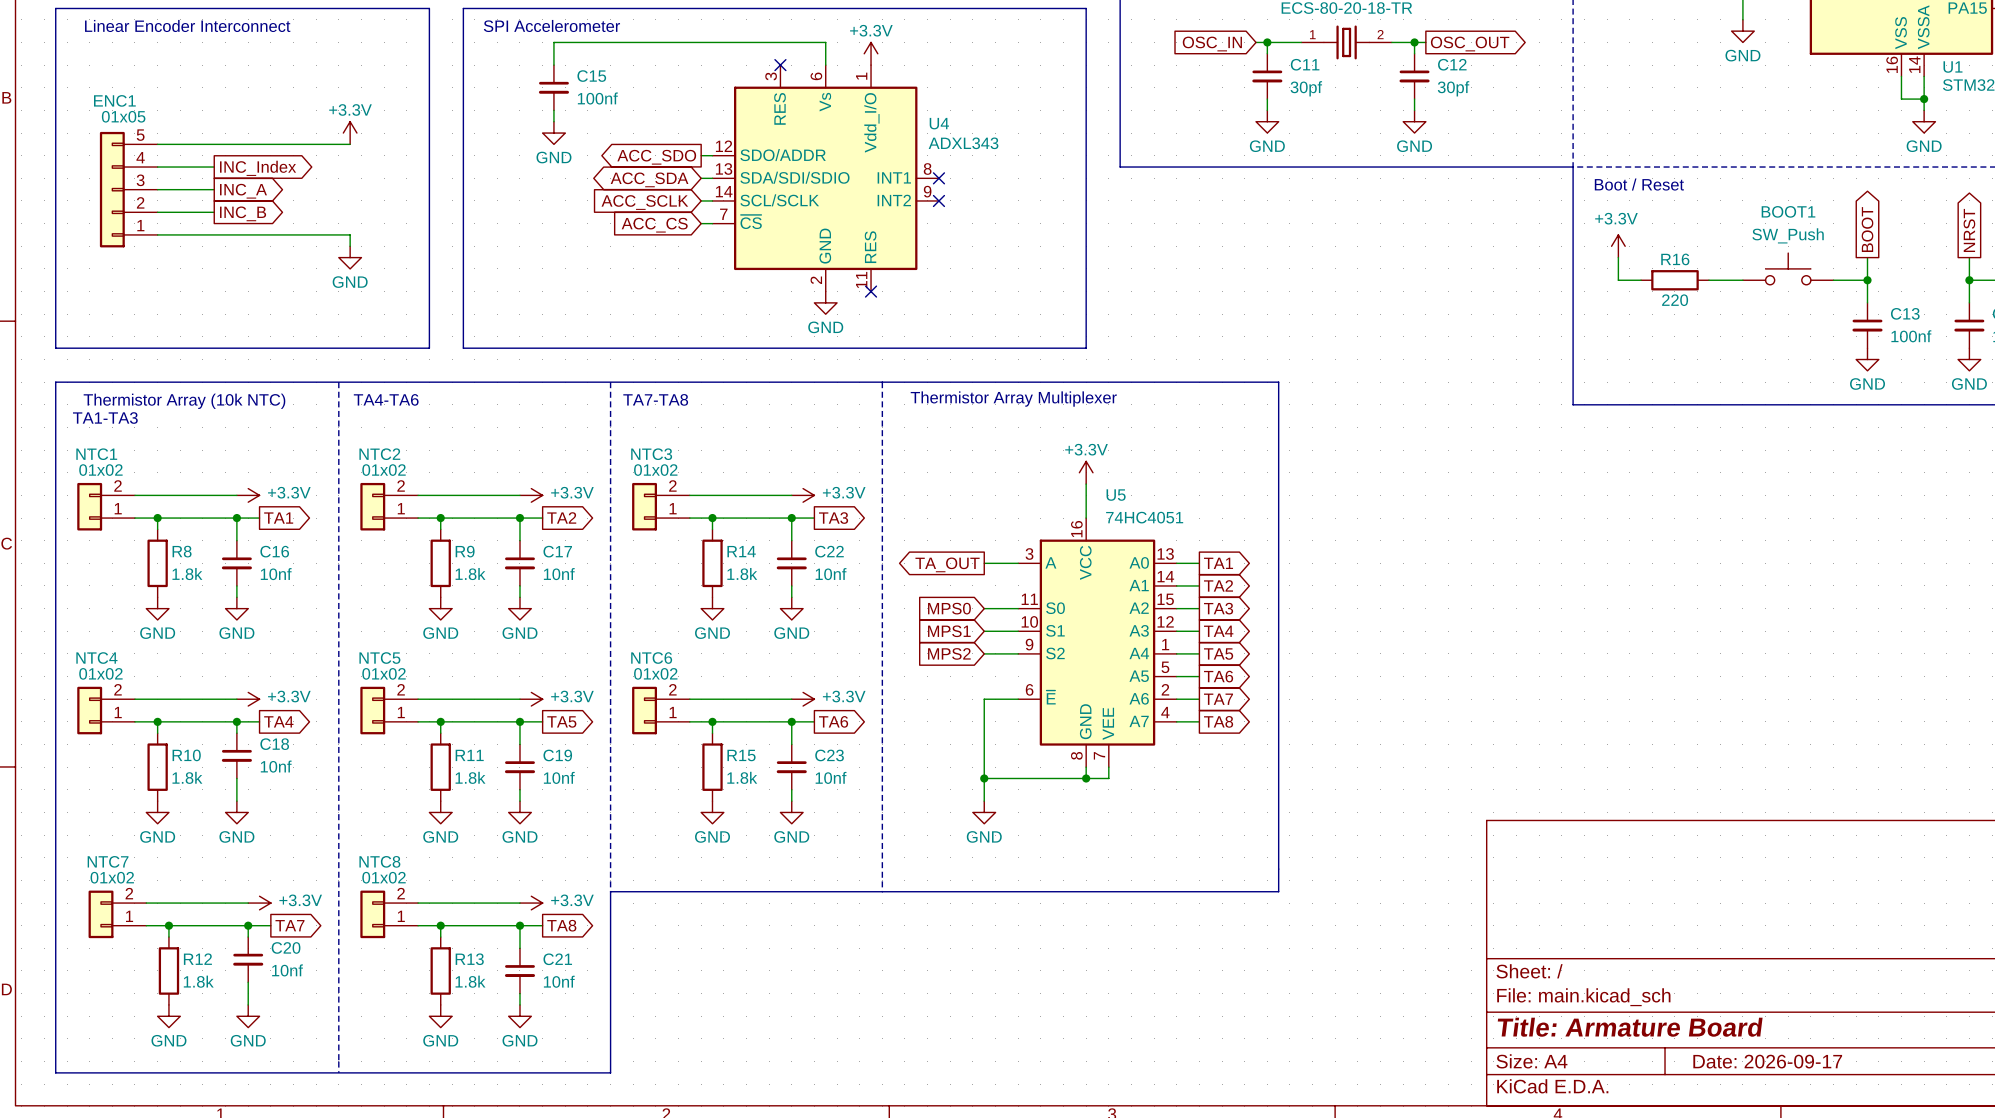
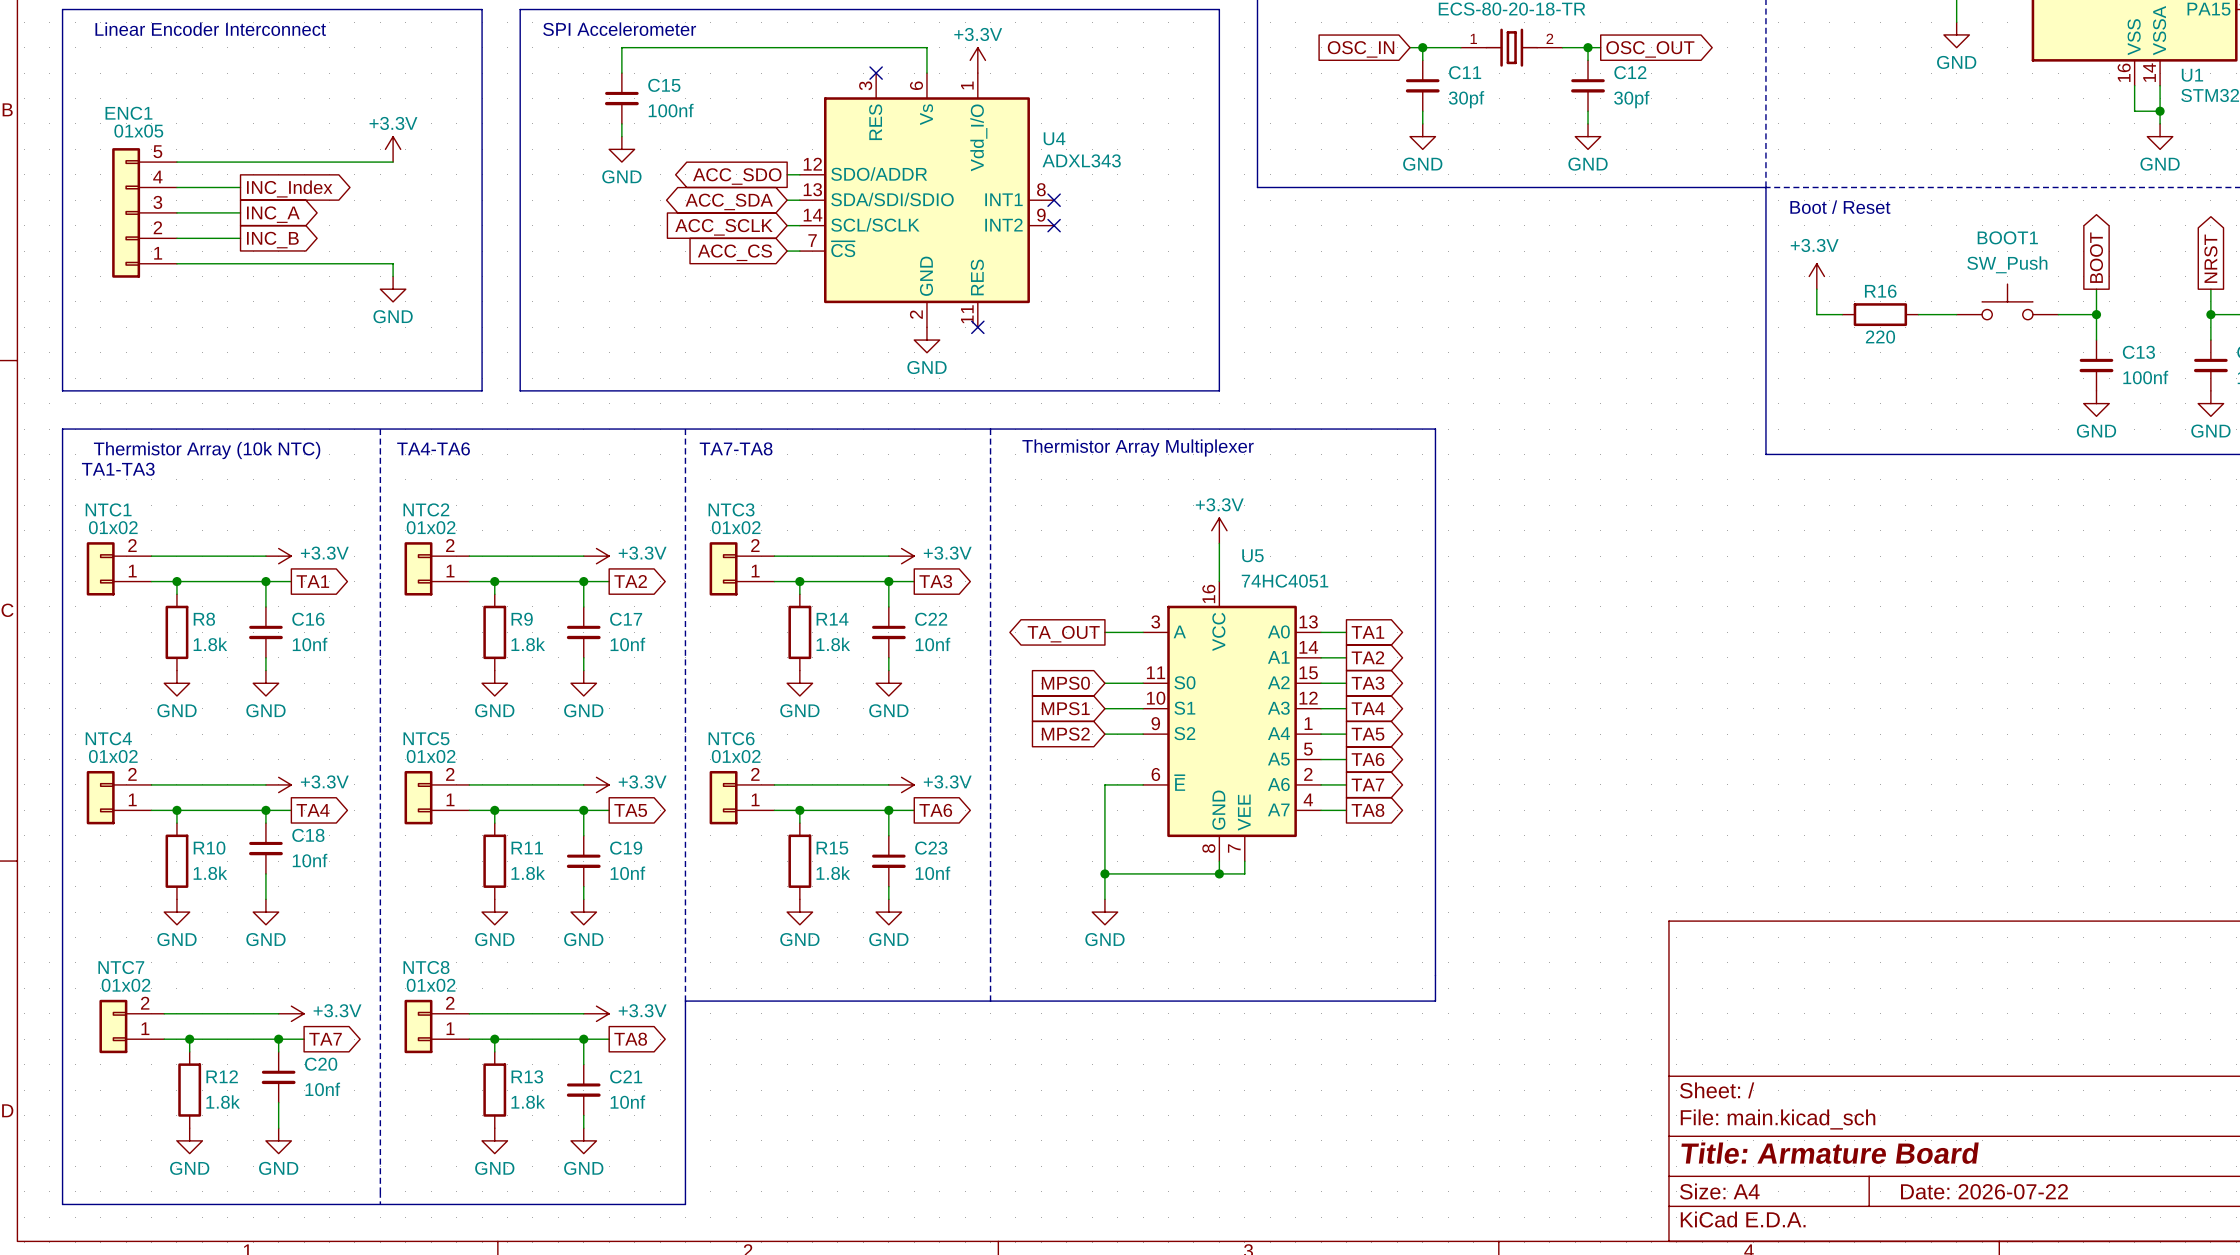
title block: Date: 2026-09-17 (1767, 1061) -> Date: 2026-07-22 (1984, 1191)

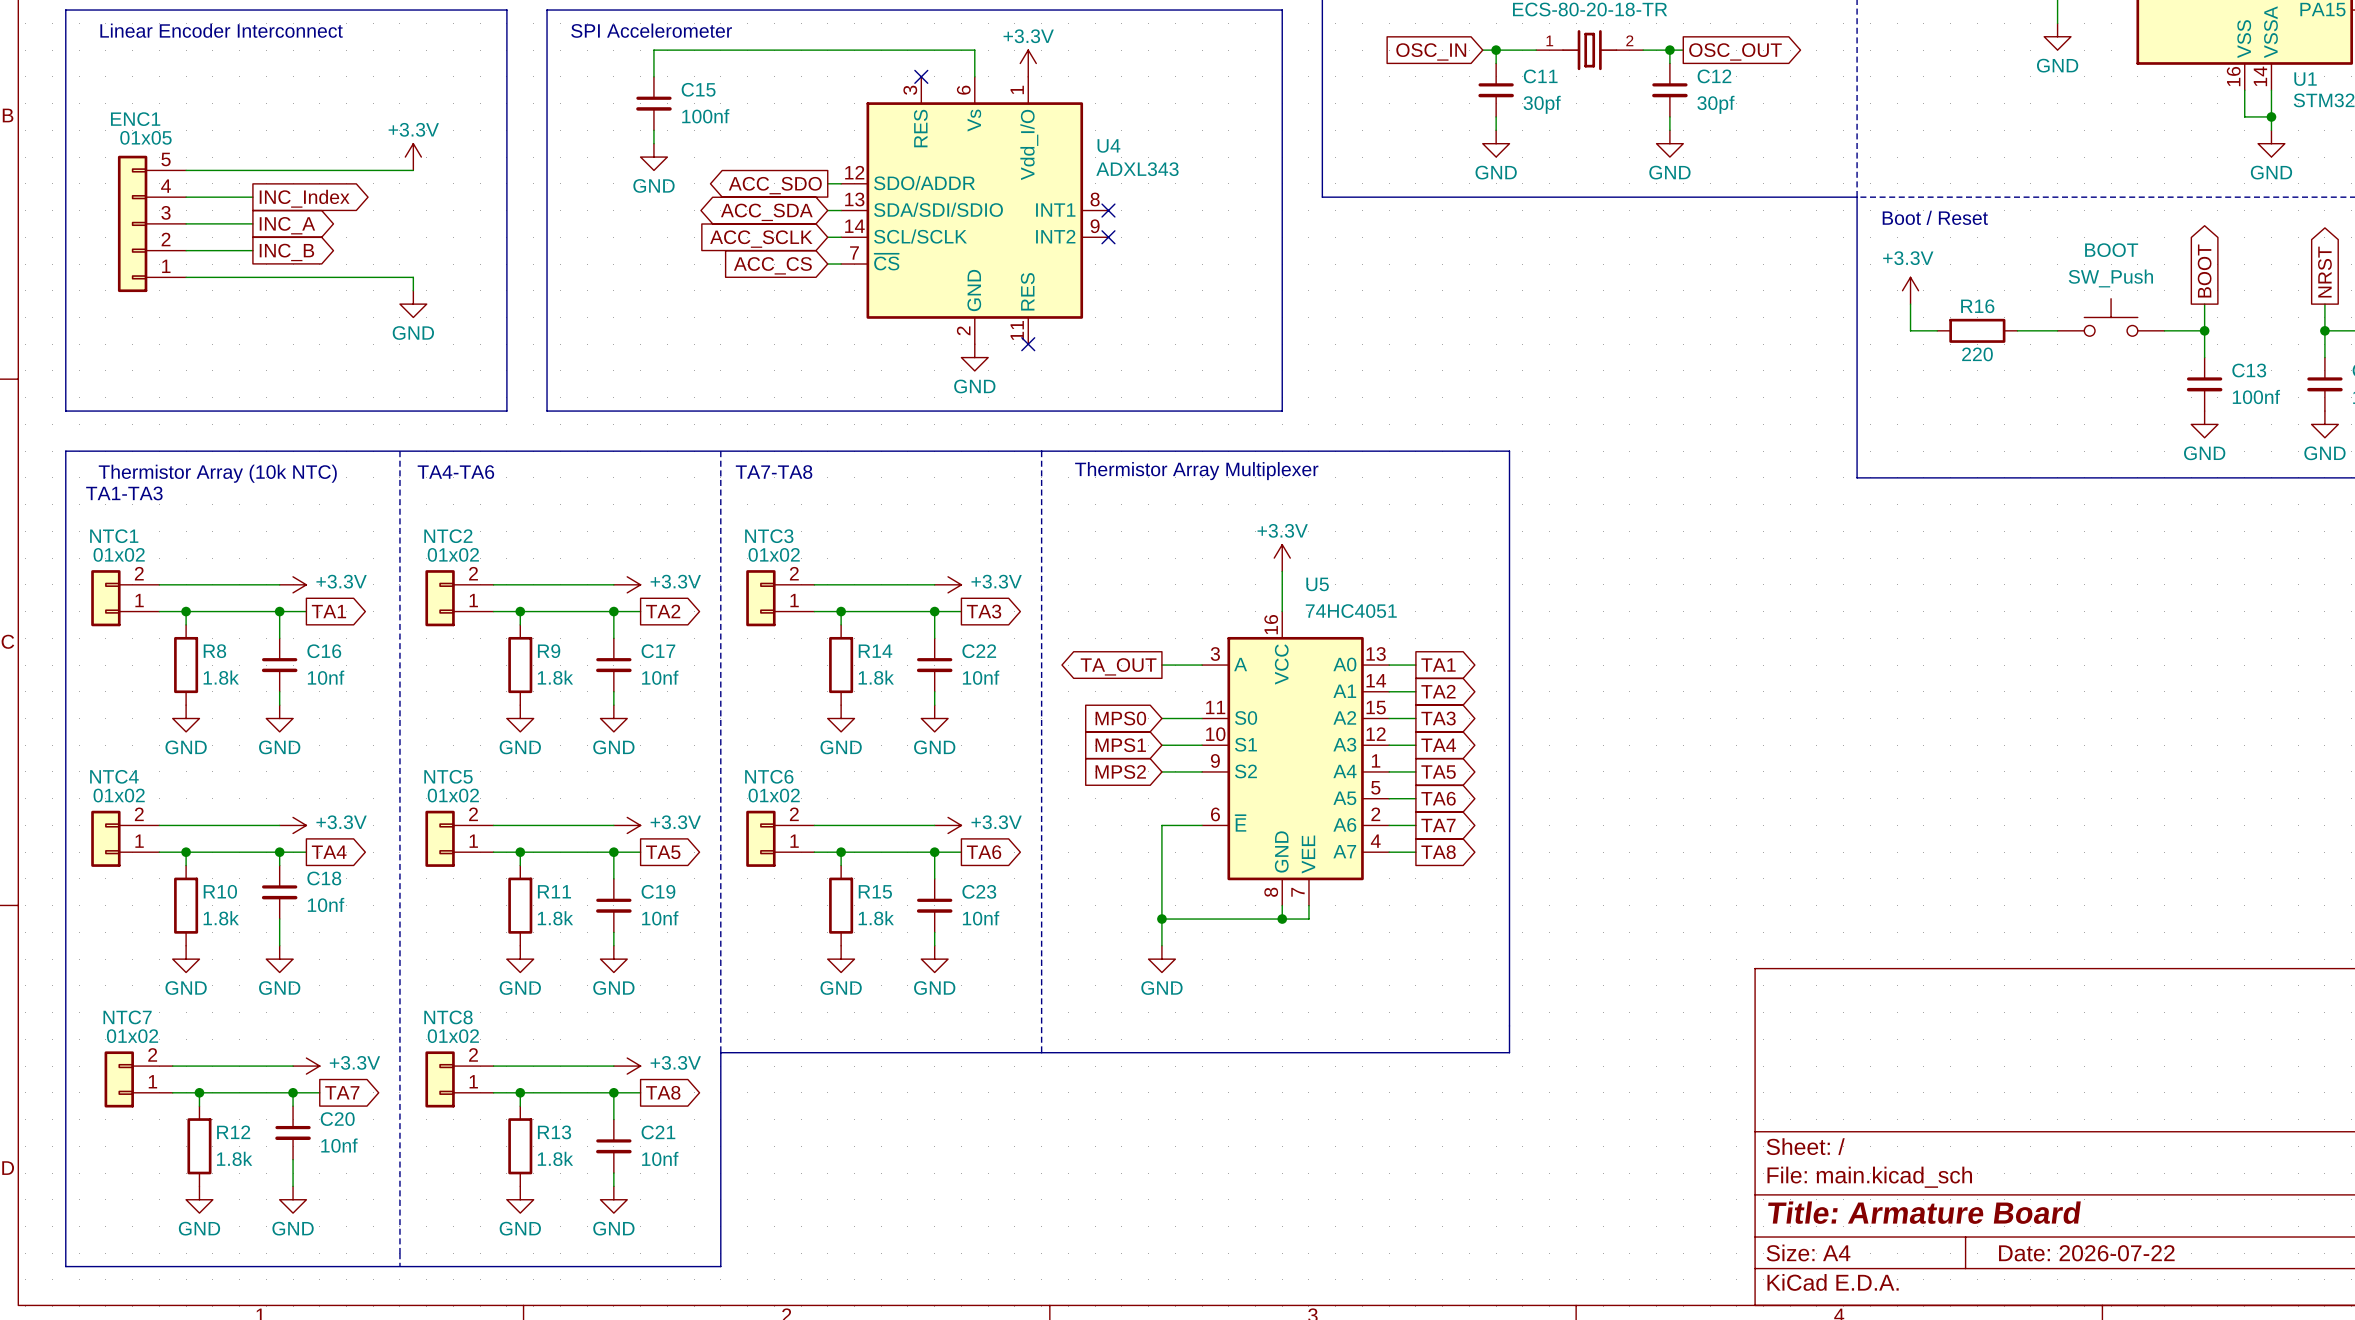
BOOT1 name: BOOT1 (2007, 237) -> BOOT (2111, 250)

